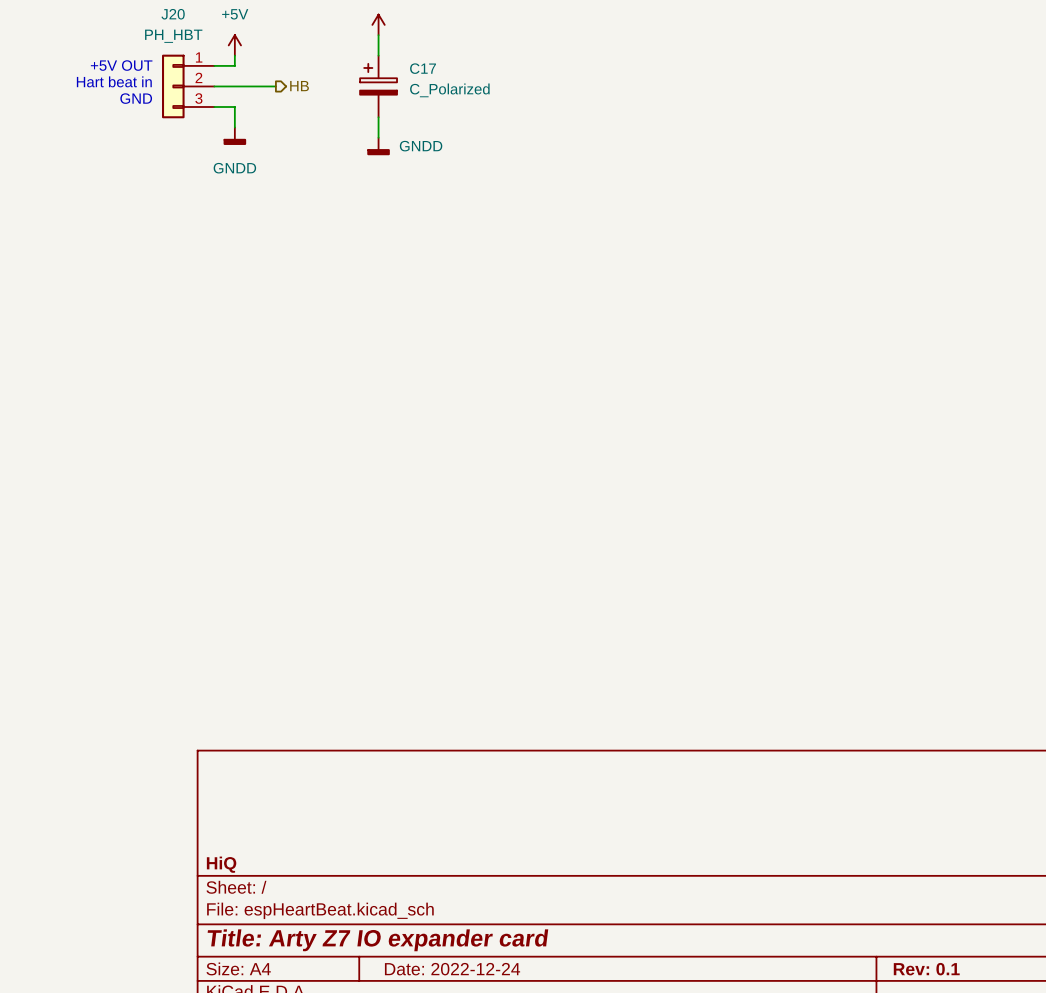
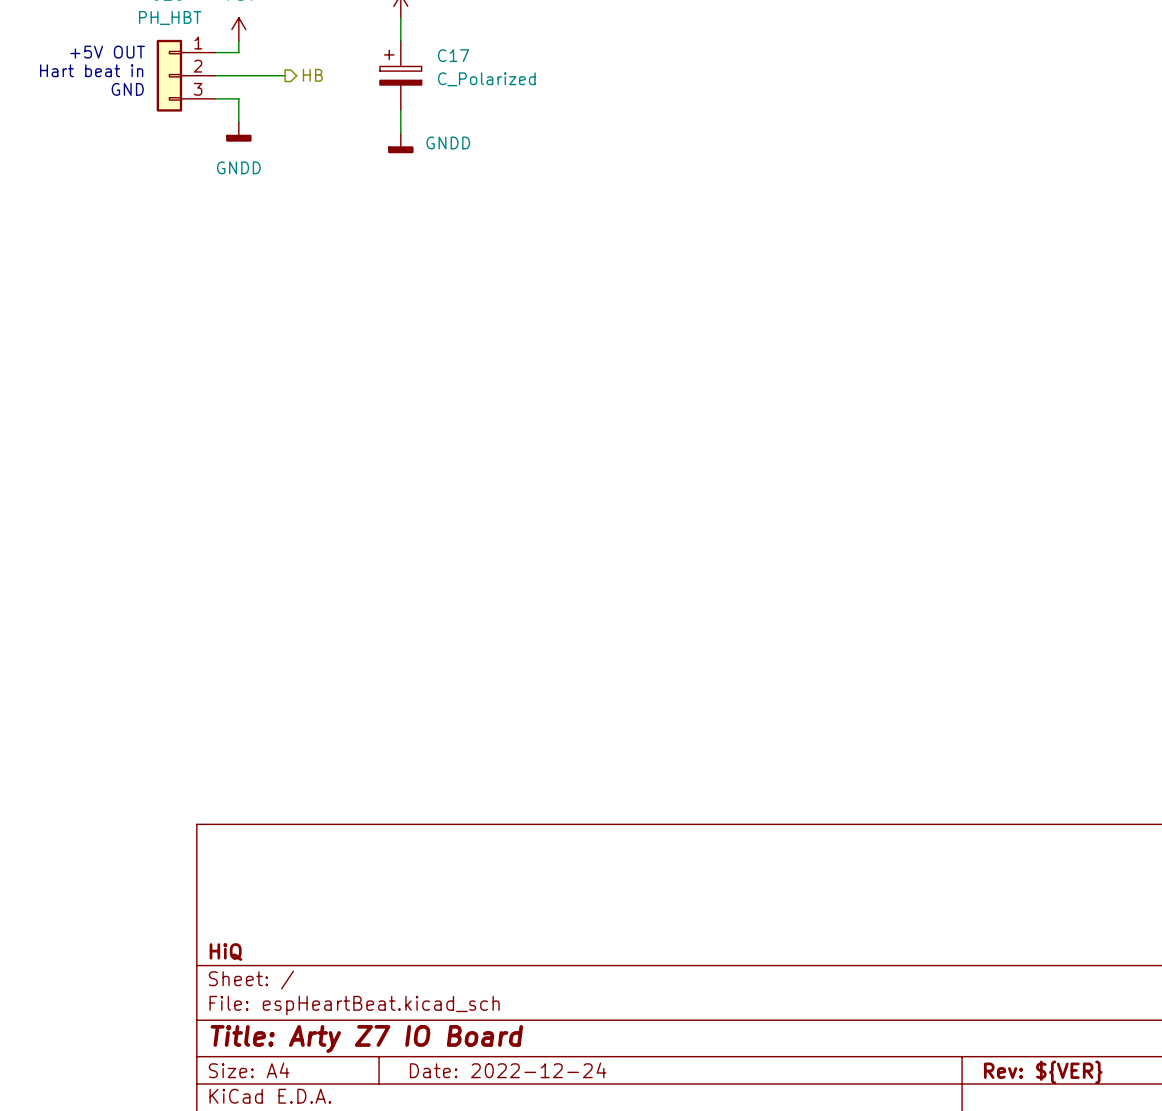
title block: Title: Arty Z7 IO expander card (377, 940) -> Title: Arty Z7 IO Board (366, 1038)
title block: Rev: 0.1 (926, 969) -> Rev: ${VER} (1043, 1072)

